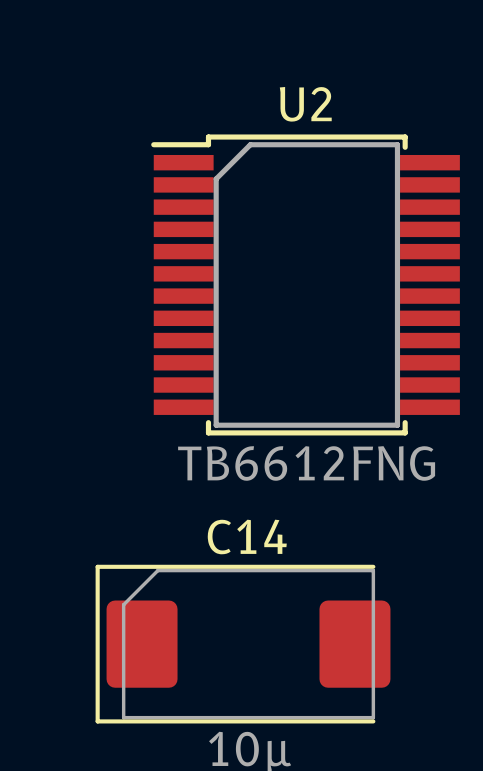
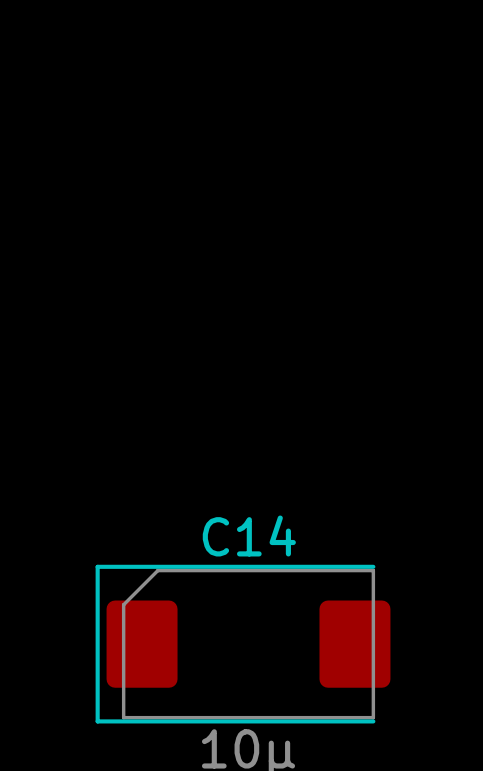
U2: TB6612FNG (305, 284) -> none

